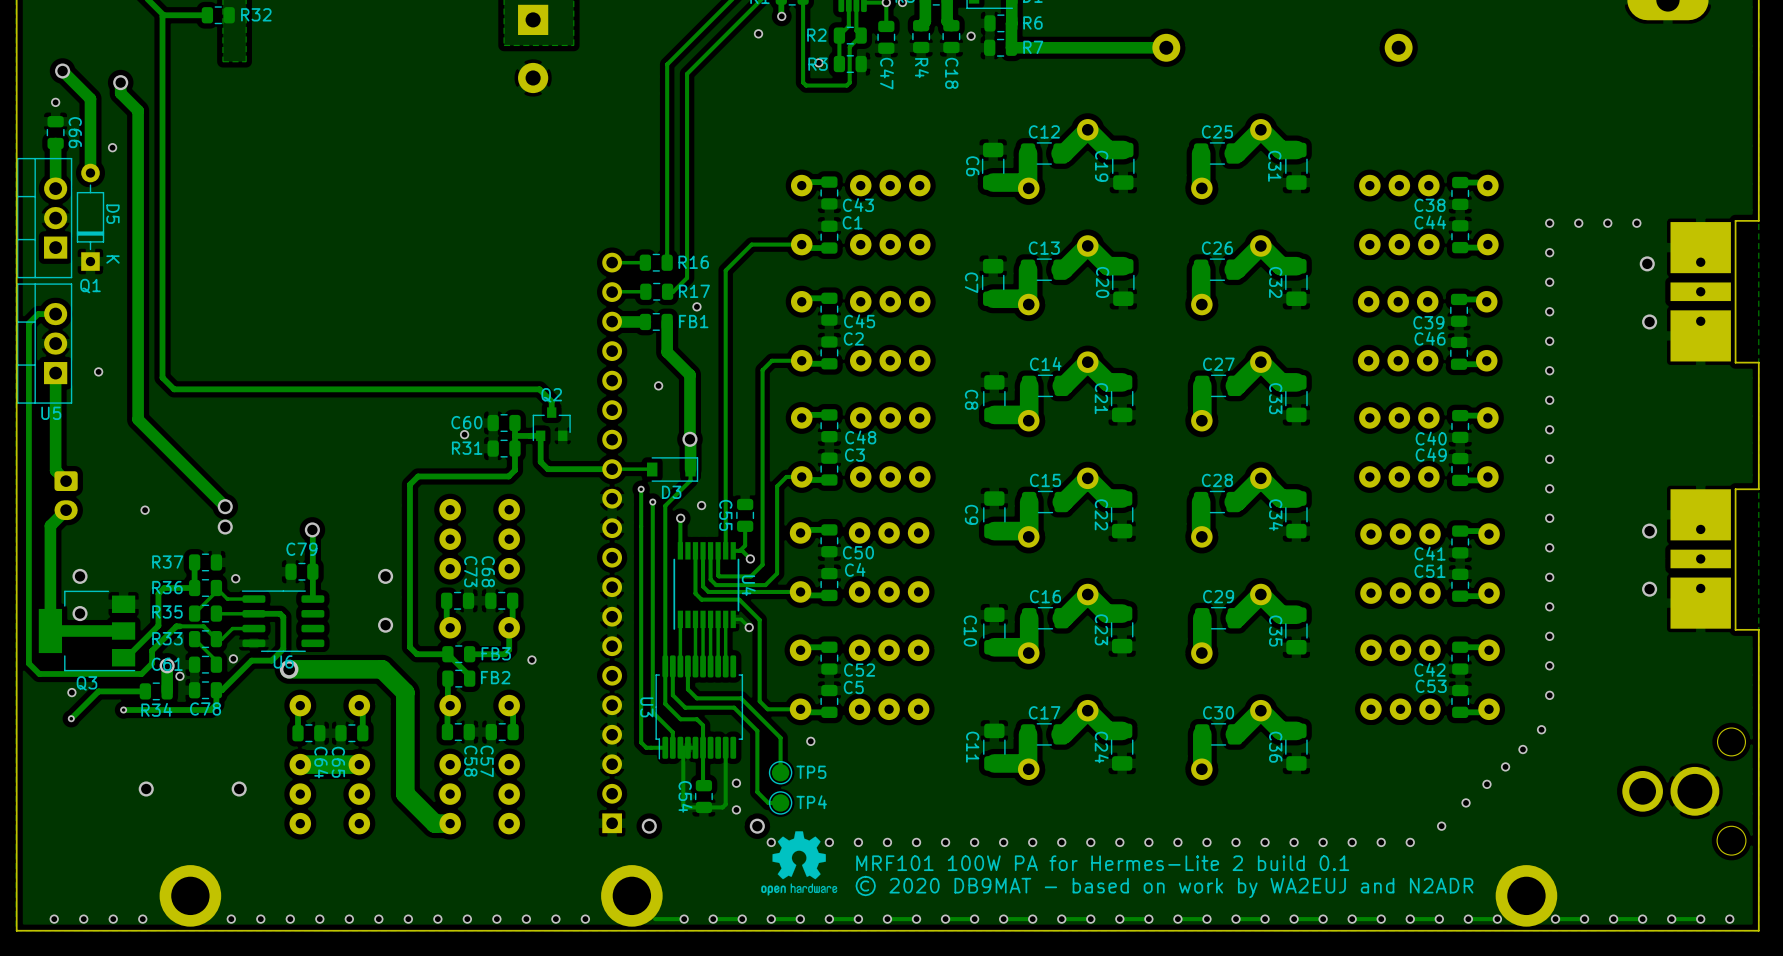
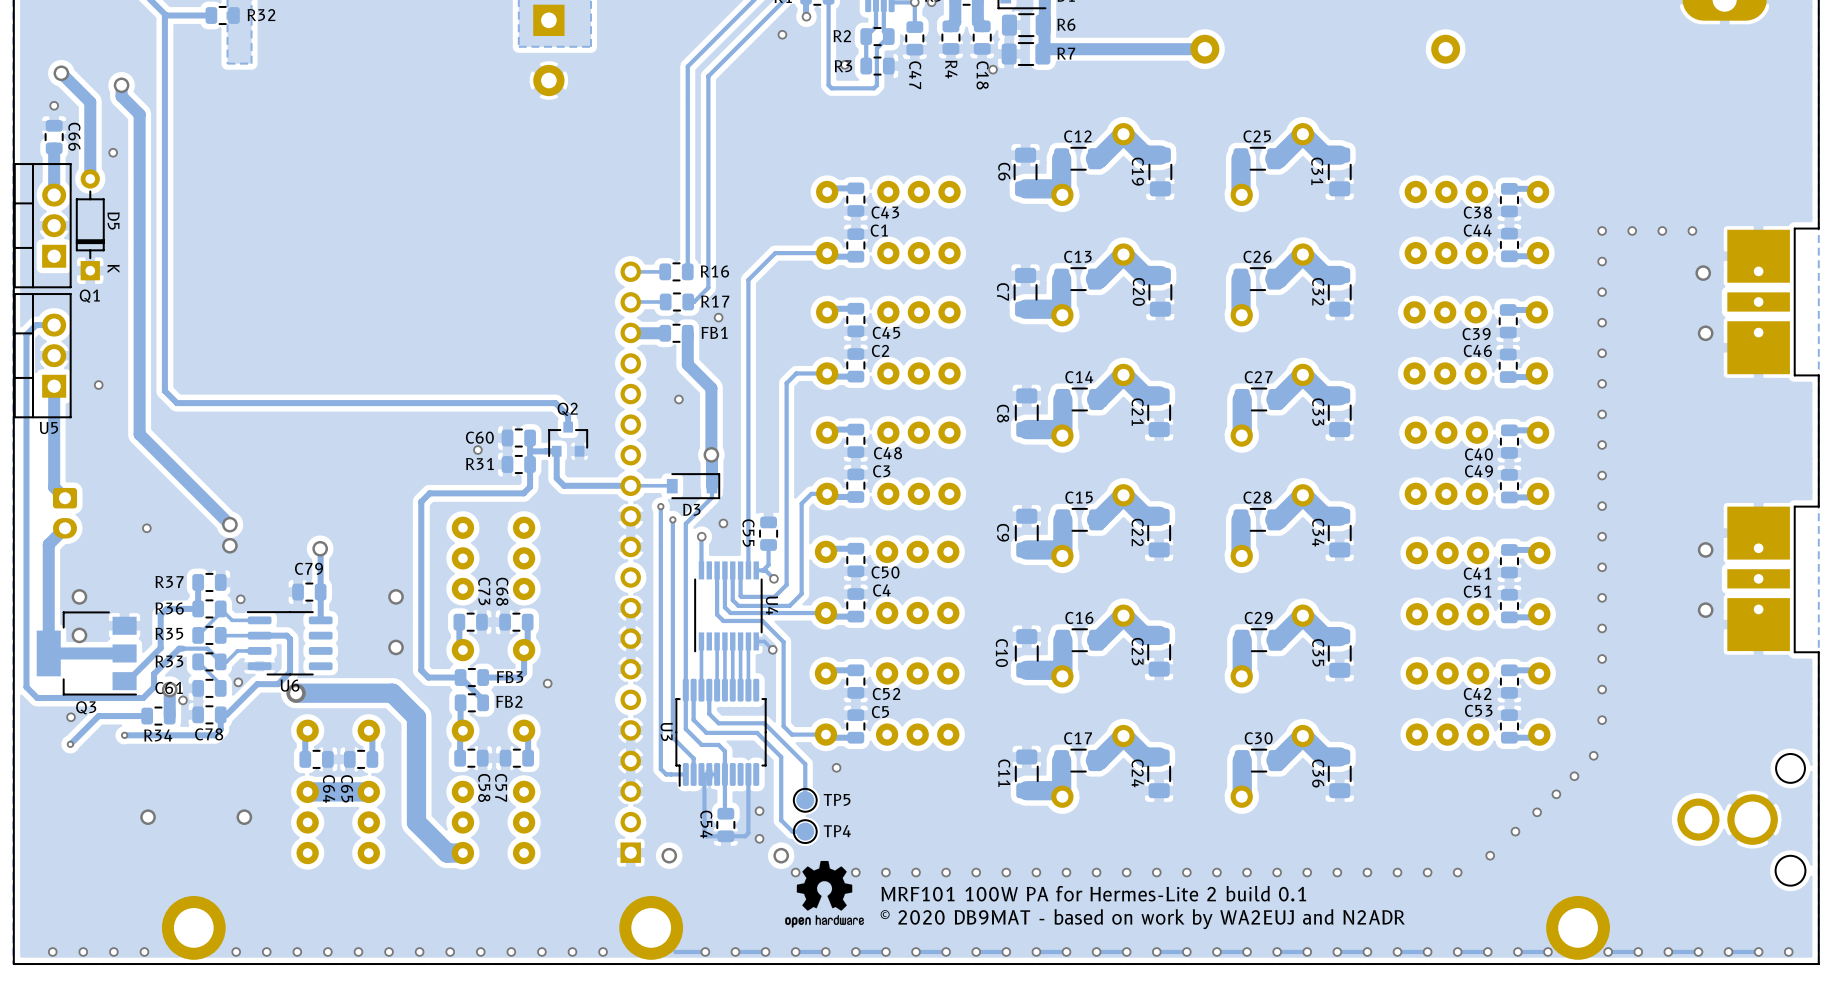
R6 footprint: [984, 14, 1018, 33] -> [1001, 13, 1051, 37]
via position: (971, 36) -> (993, 69)
R7 footprint: [984, 38, 1018, 57] -> [1001, 42, 1051, 66]

